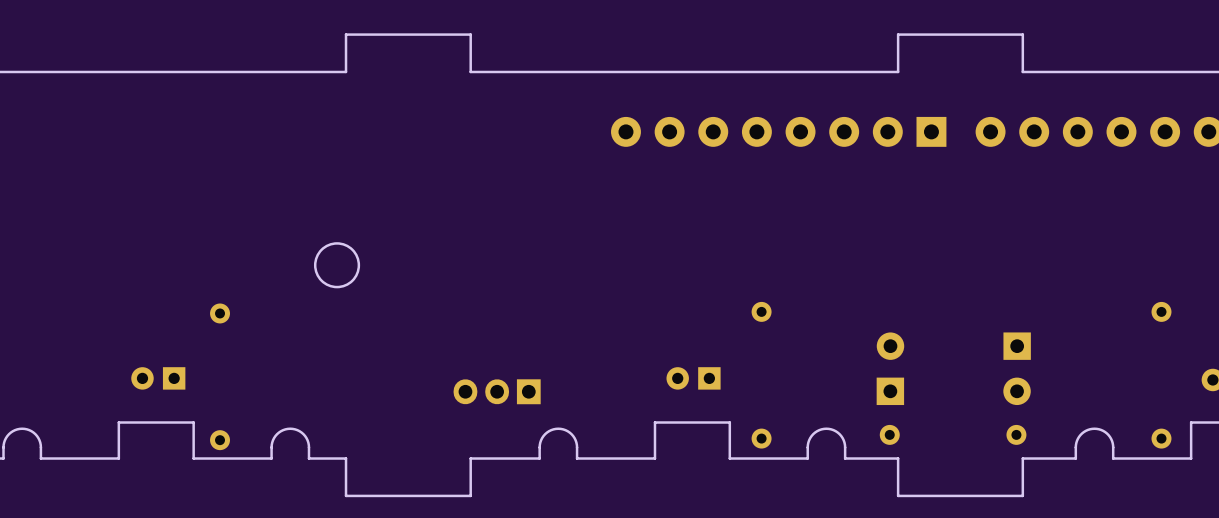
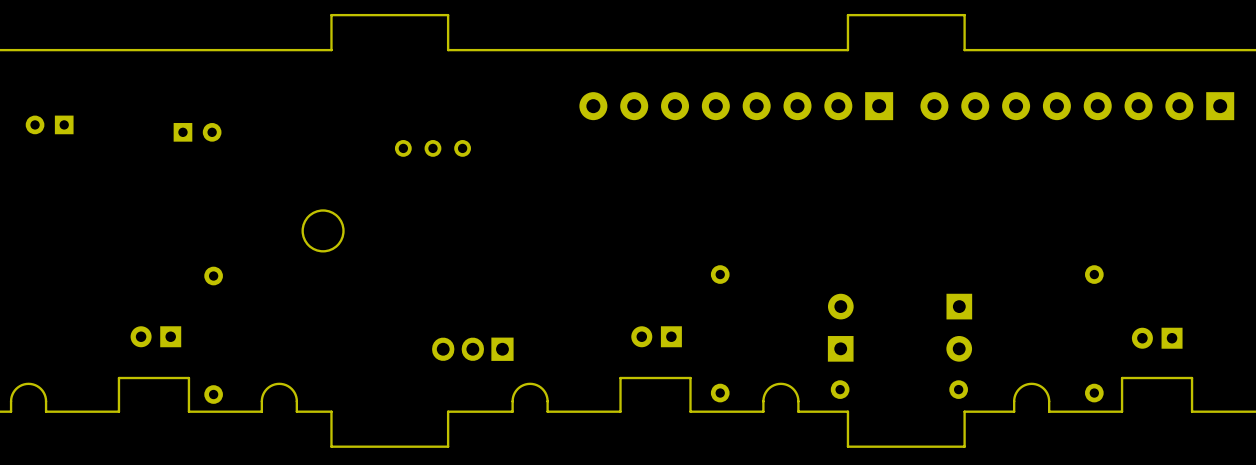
part: none -> (49, 124)
part: none -> (197, 132)
part: none -> (432, 148)

